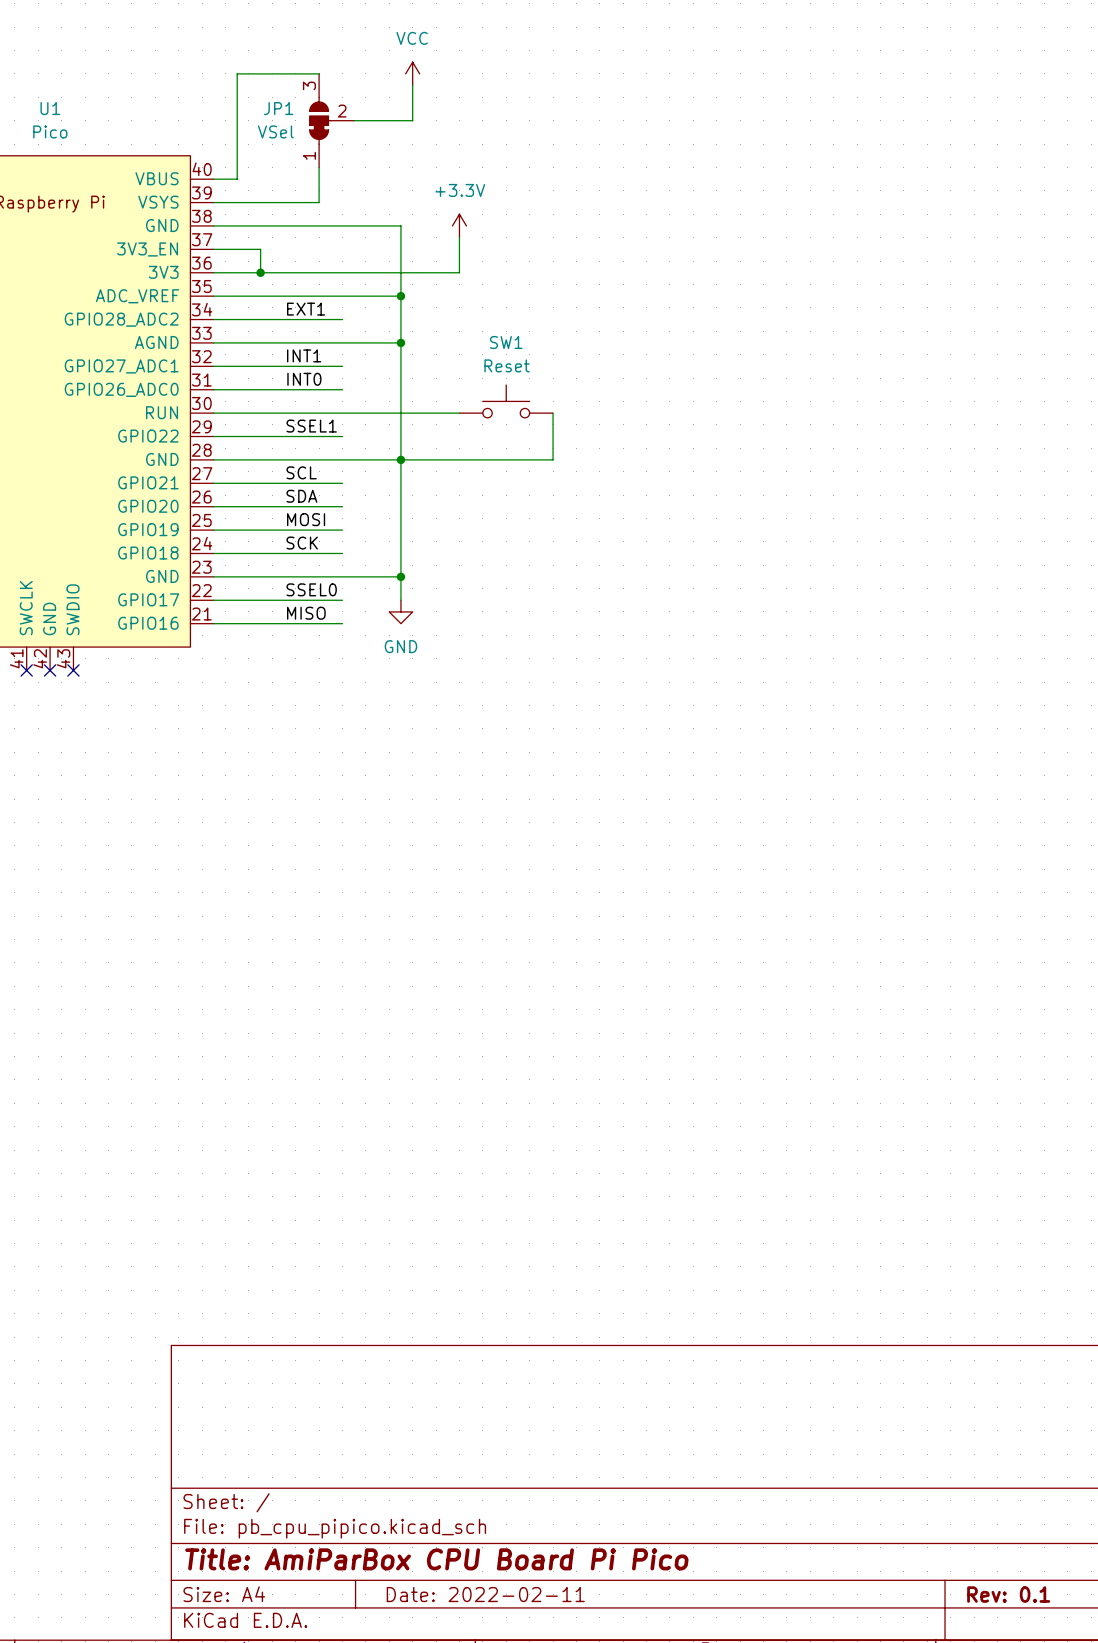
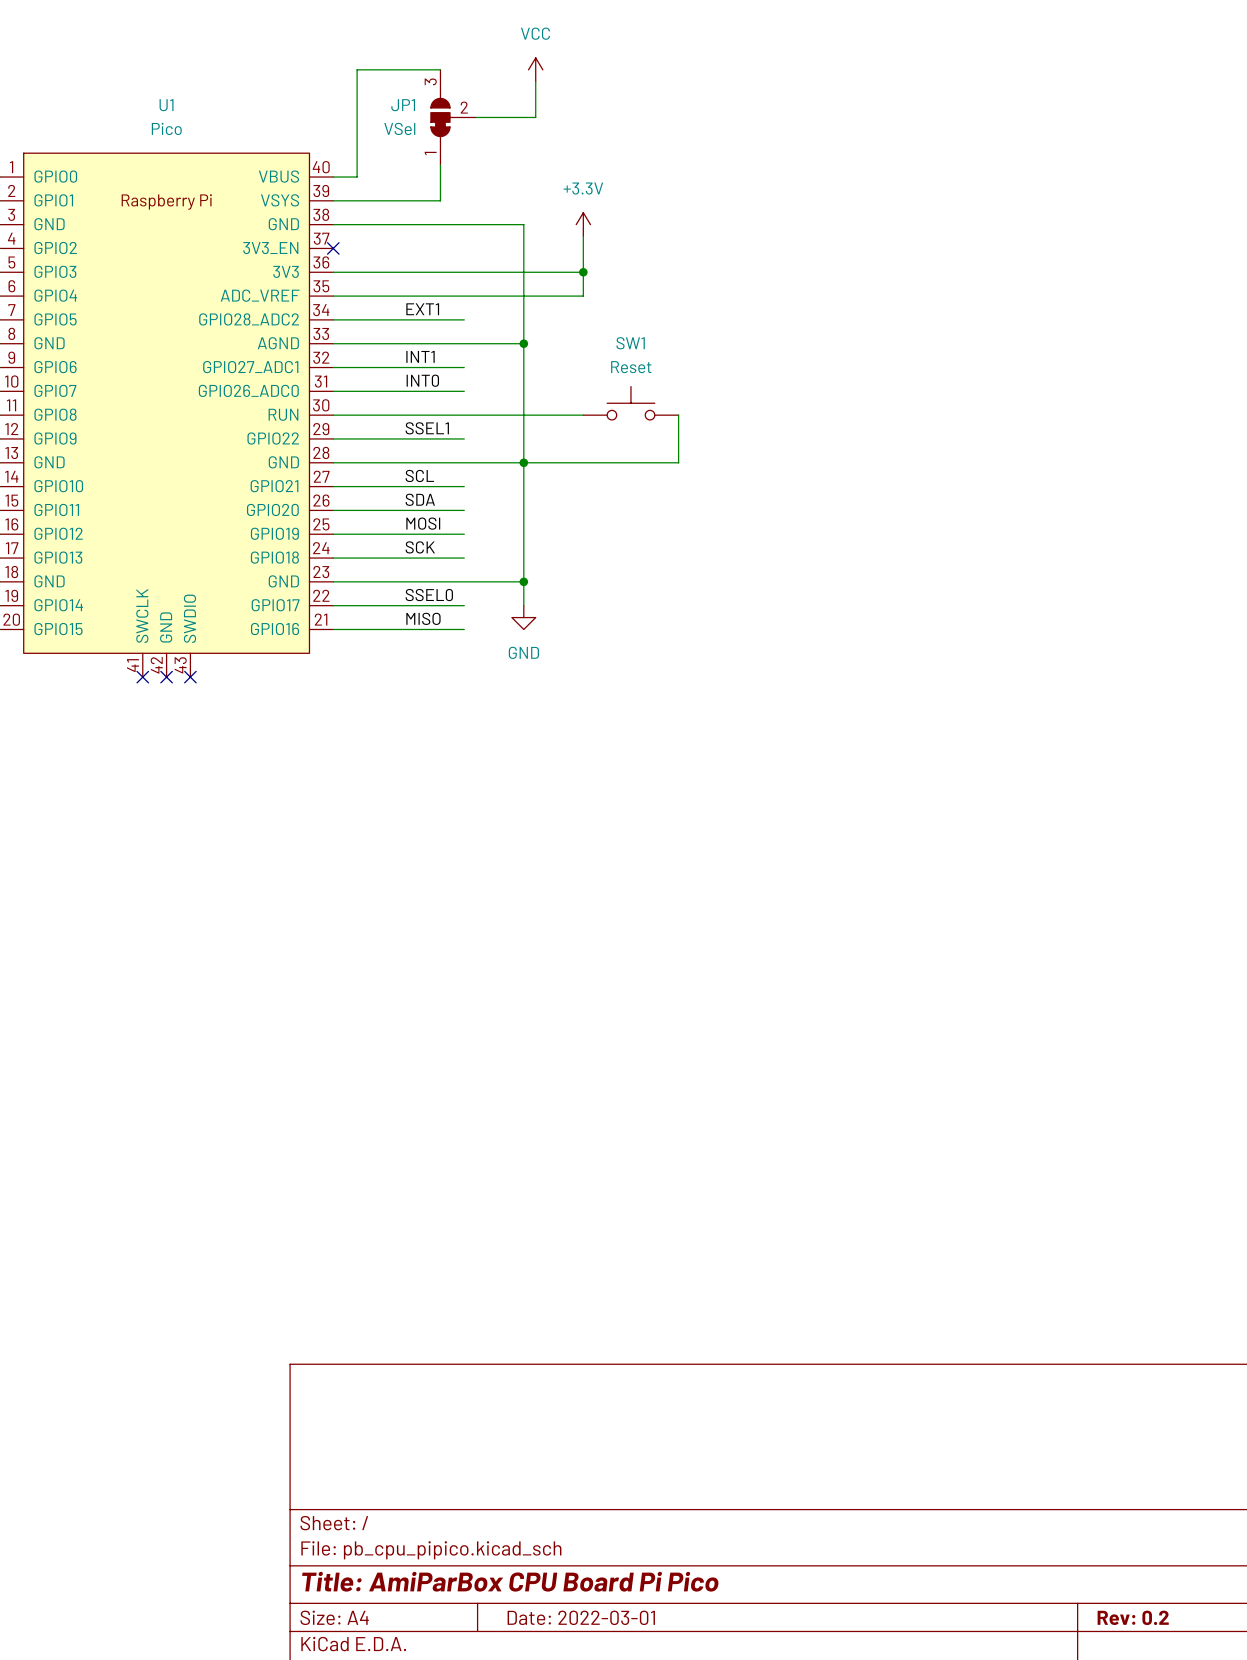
wire: (213, 249) (260, 249) (260, 272) -> none
no-connect mark: none -> (333, 248)
junction: (260, 272) -> none
wire: none -> (583, 272) (583, 296) (523, 296)
junction: none -> (583, 272)
junction: (400, 296) -> none
title block: Date: 2022-02-11 (485, 1594) -> Date: 2022-03-01 (581, 1617)
title block: Rev: 0.1 (1008, 1594) -> Rev: 0.2 (1133, 1617)

